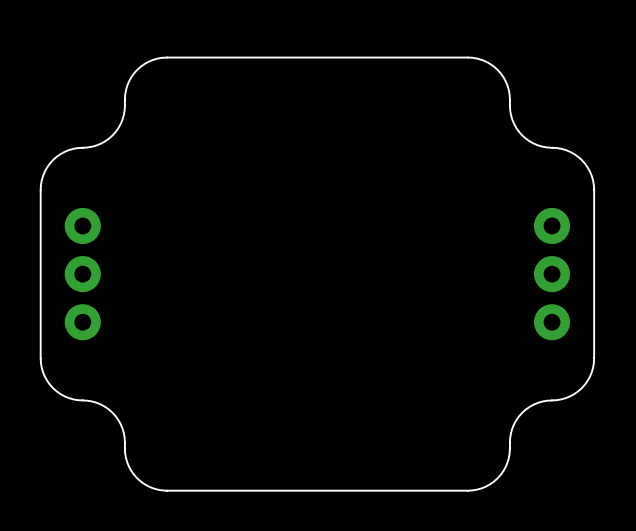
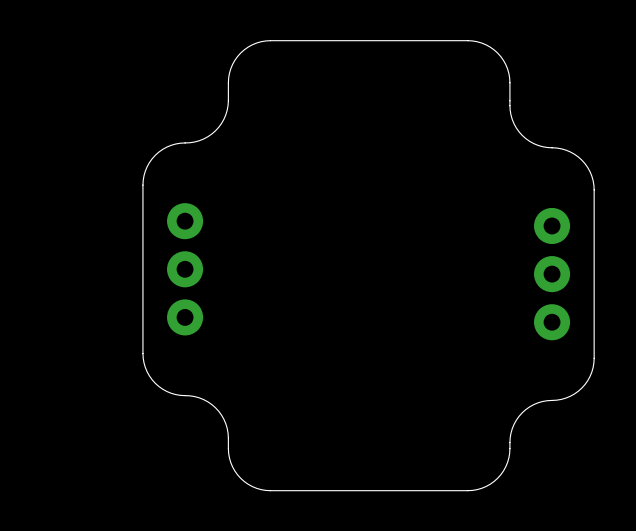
board edge: (509, 99) (507, 85) (497, 69) (486, 61) (472, 57) (167, 57) (148, 61) (134, 73) (125, 90) (124, 105) -> (509, 99) (509, 78) (503, 60) (490, 47) (477, 41) (270, 40) (261, 41) (248, 47) (234, 60) (228, 78) (228, 100)
part: none -> (185, 269)
part: (82, 274) -> none
board edge: (124, 442) (125, 457) (131, 470) (140, 481) (153, 488) (167, 490) (270, 490) -> (228, 437) (229, 457) (237, 474) (252, 486) (270, 490)

